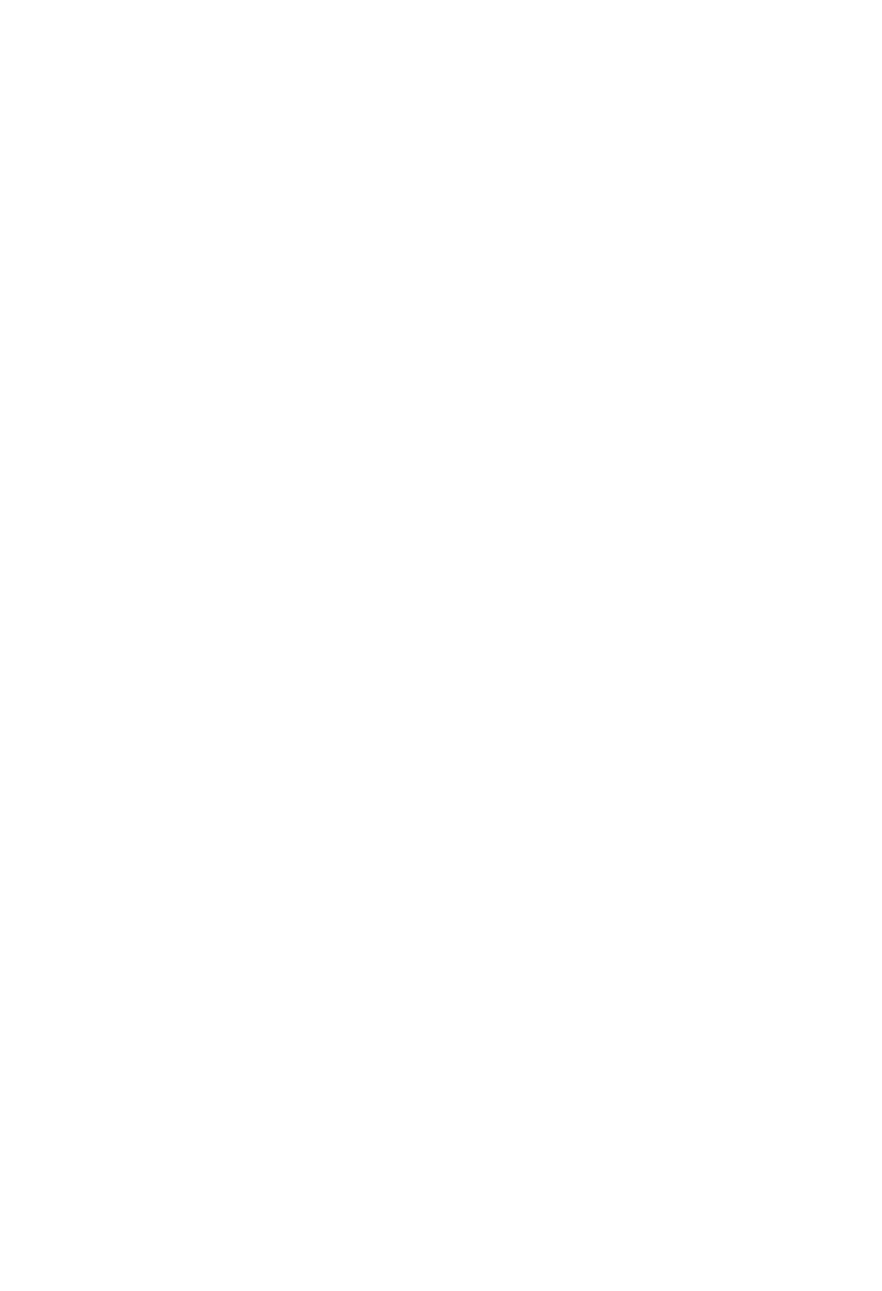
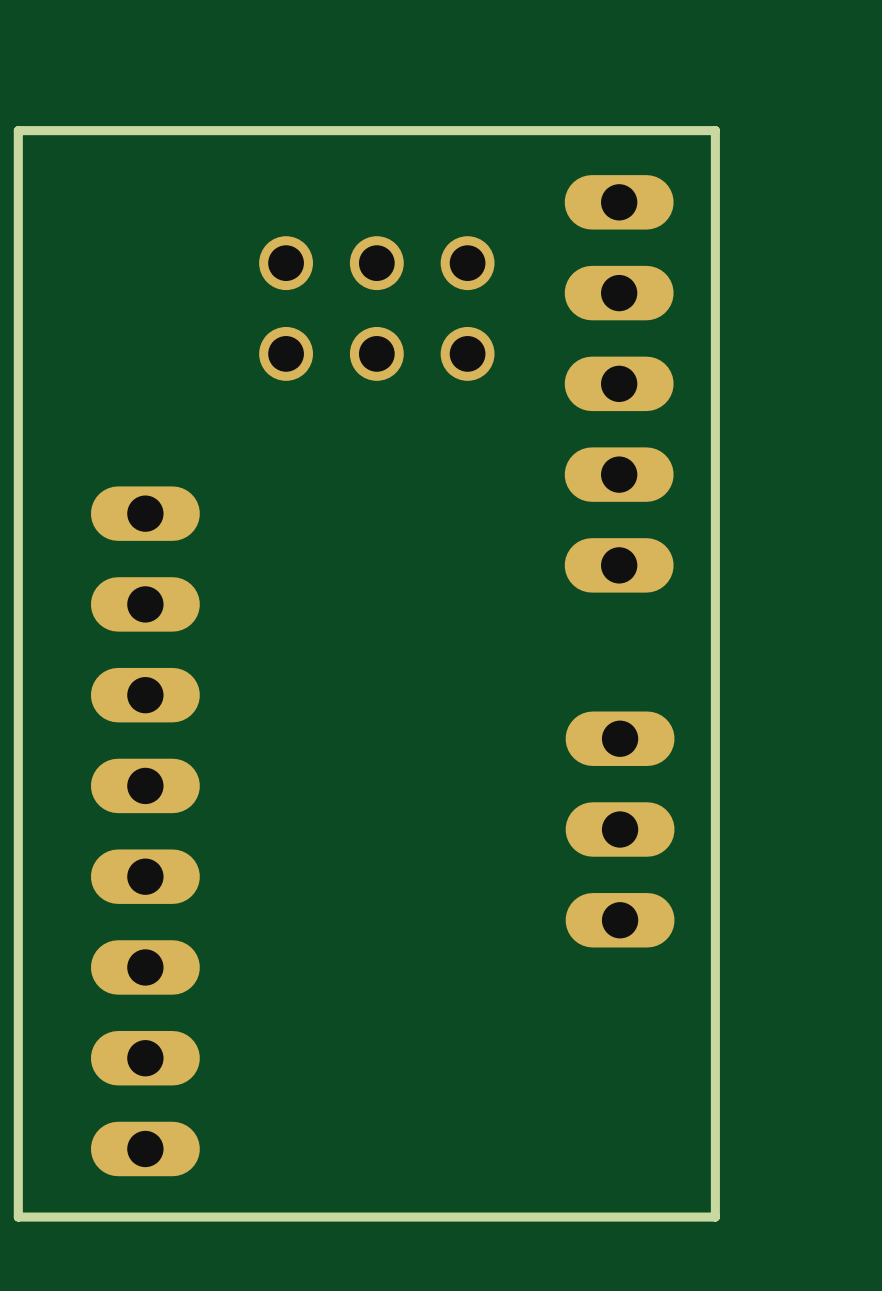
board edge: none -> (715, 130) (715, 1217) (18, 1217) (18, 130) (715, 130)
part: none -> (376, 308)
part: none -> (619, 383)
part: none -> (620, 829)
part: none -> (145, 831)

